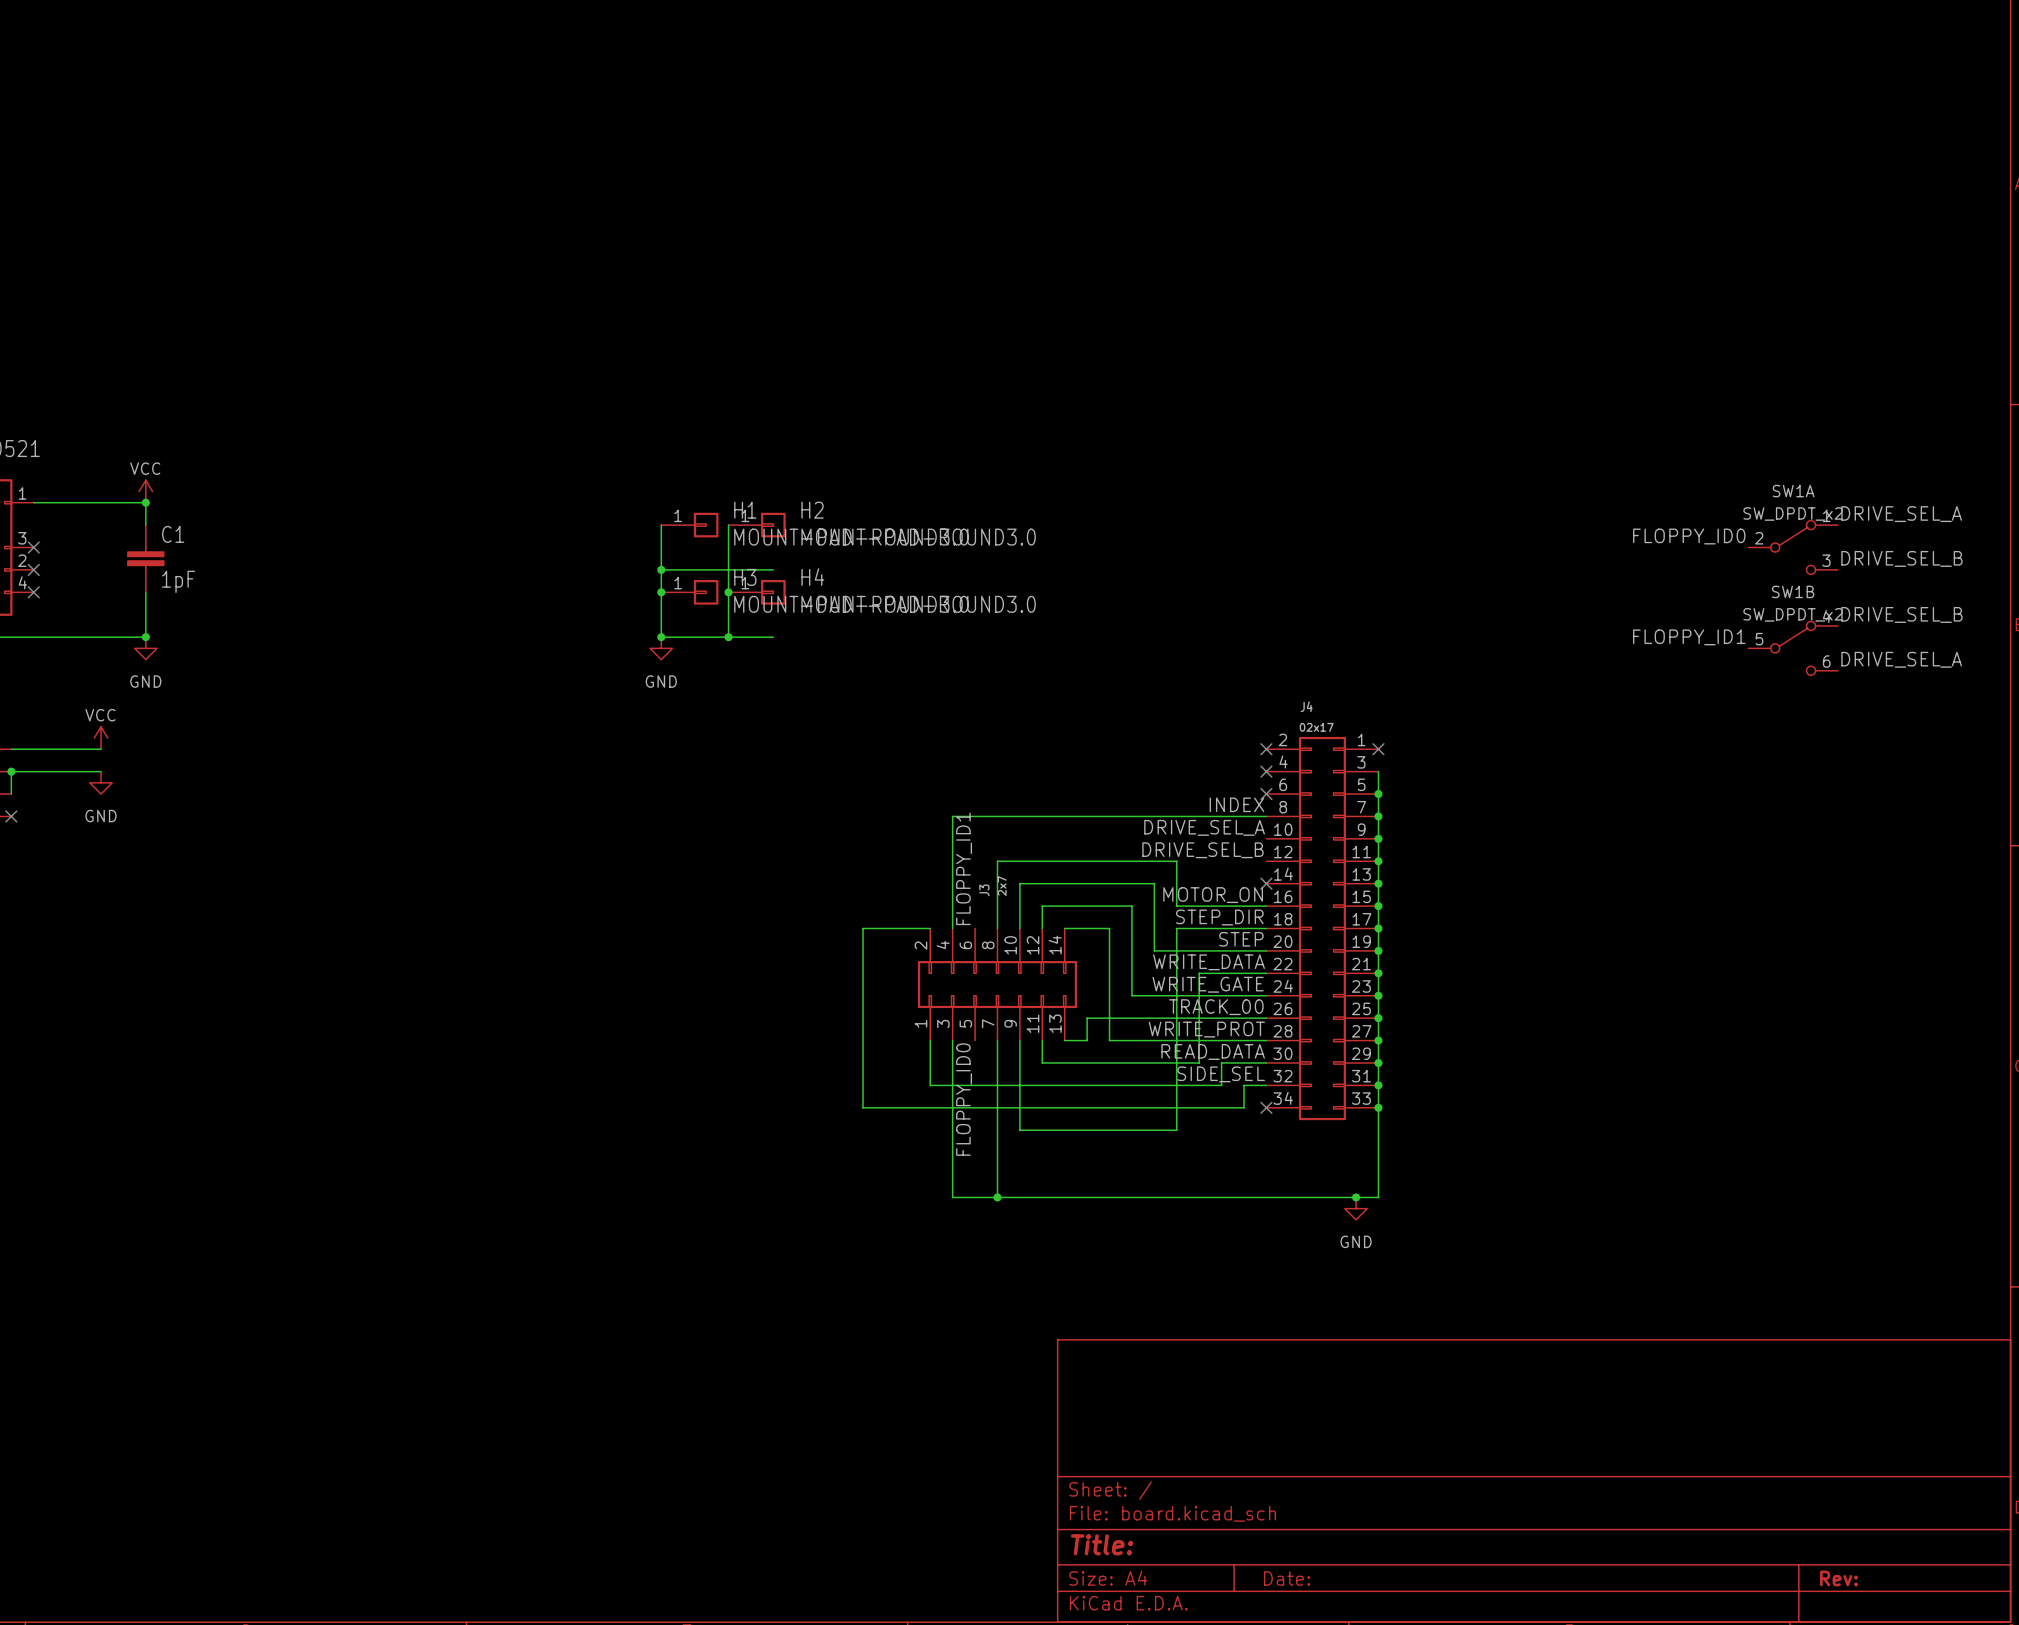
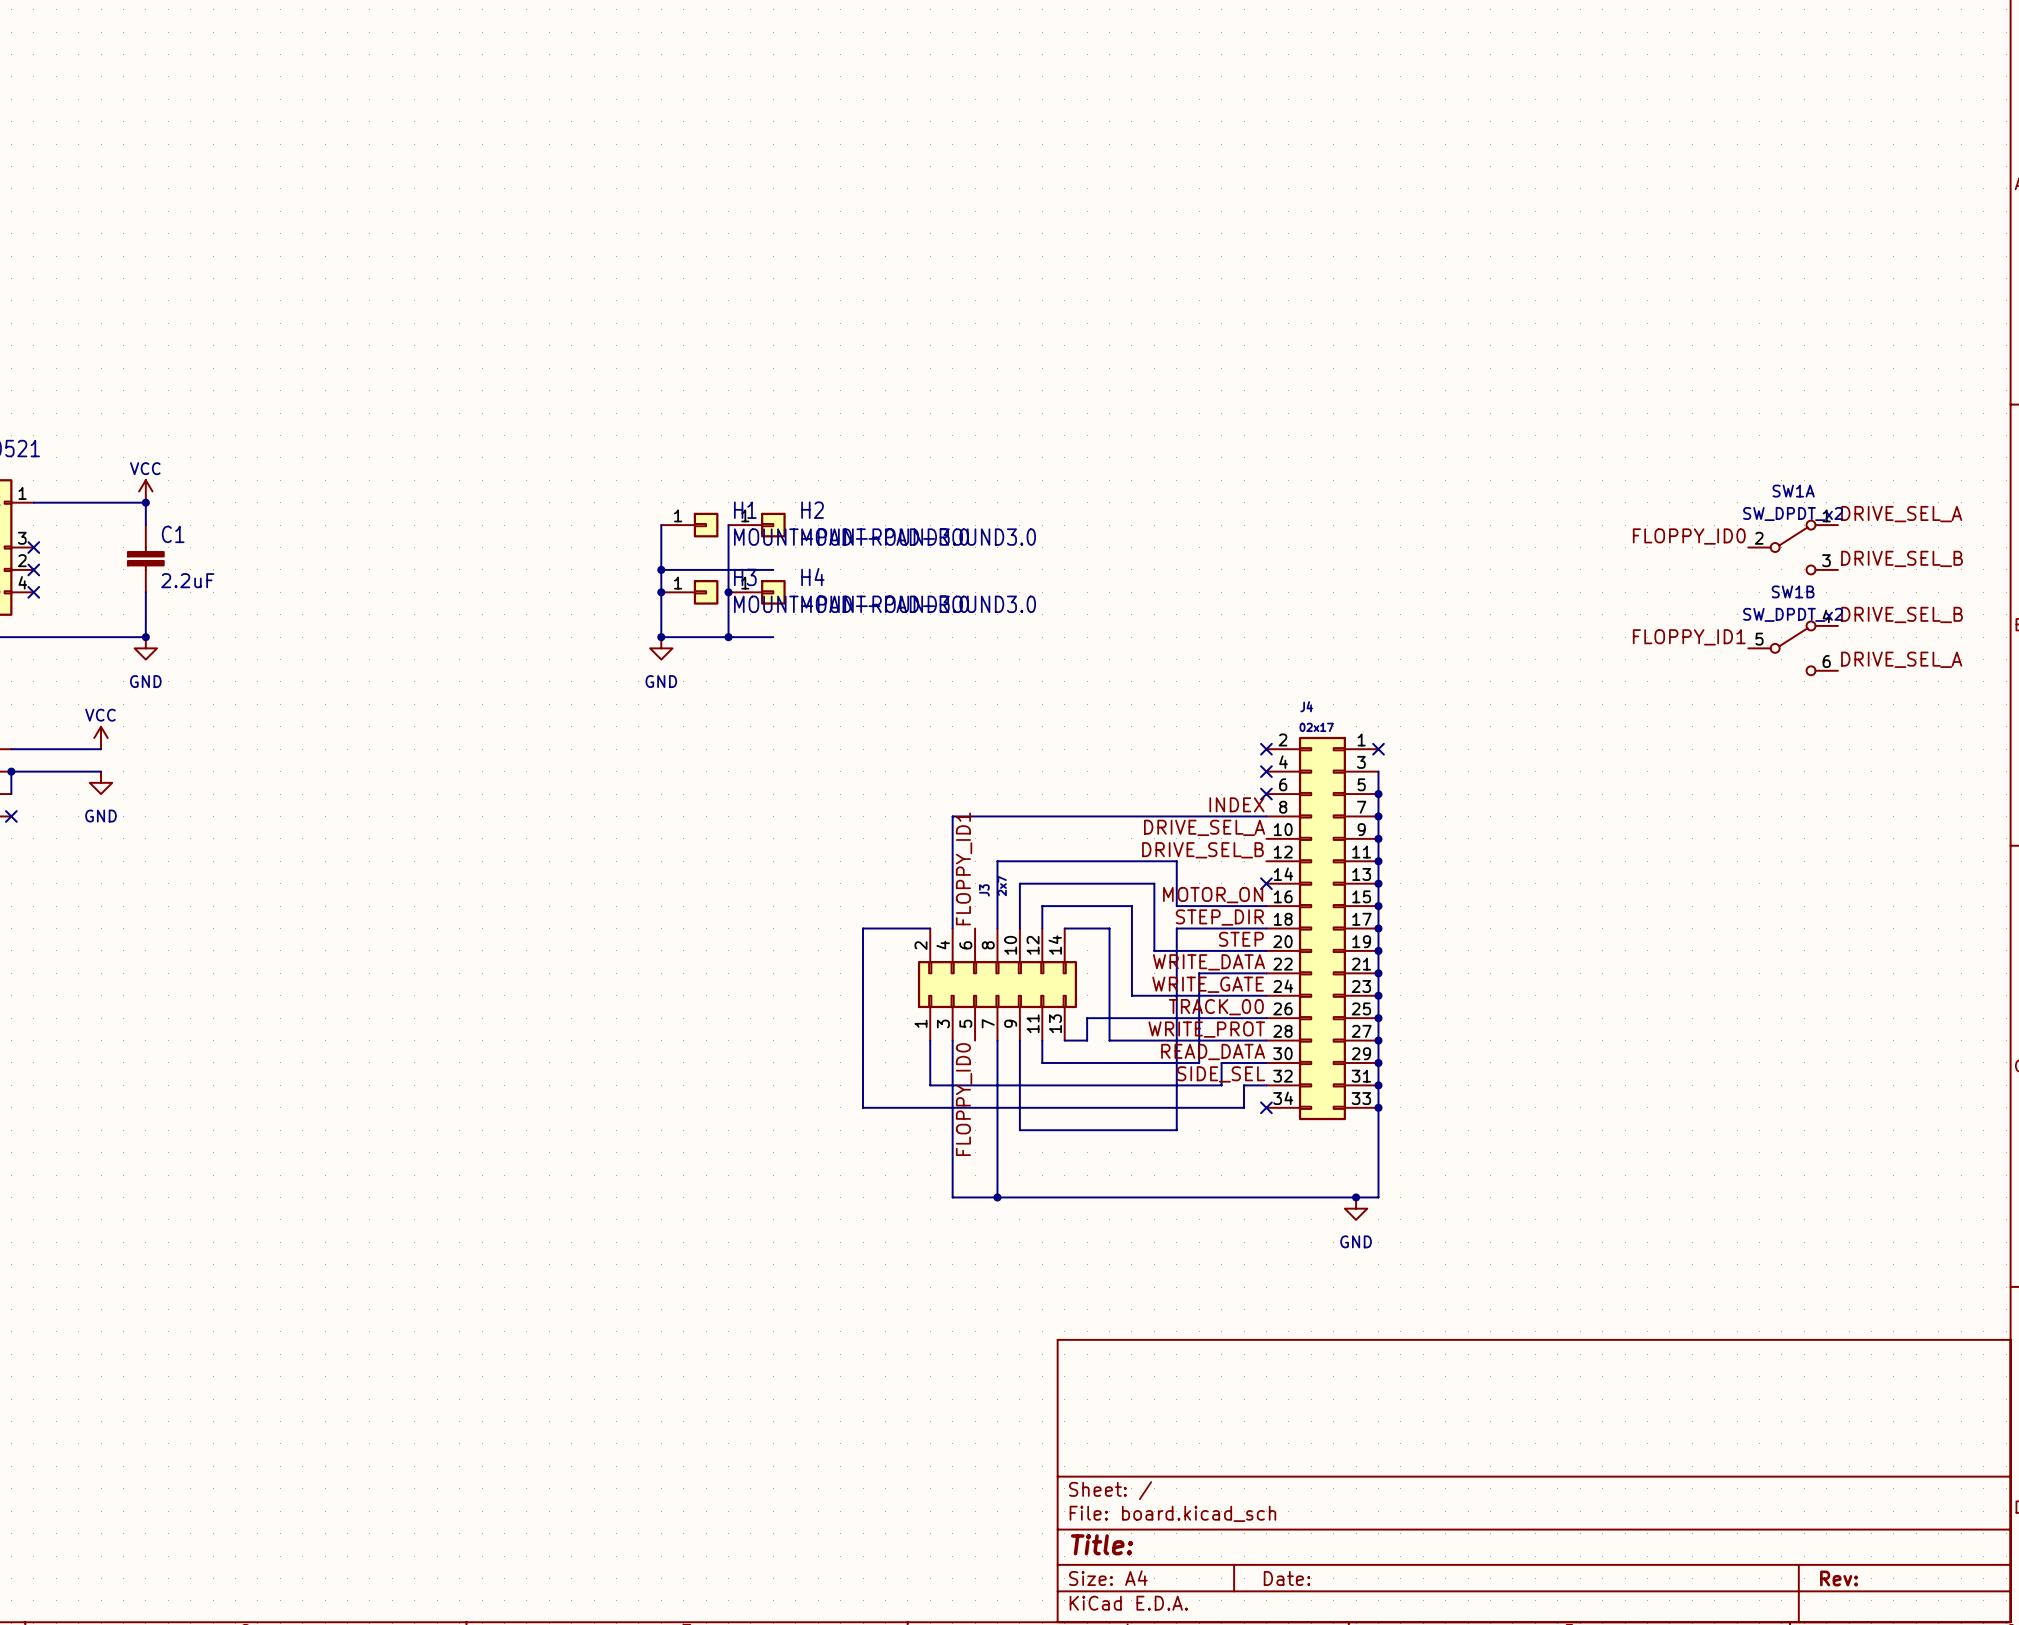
C1 value: 1pF (178, 581) -> 2.2uF (187, 580)

